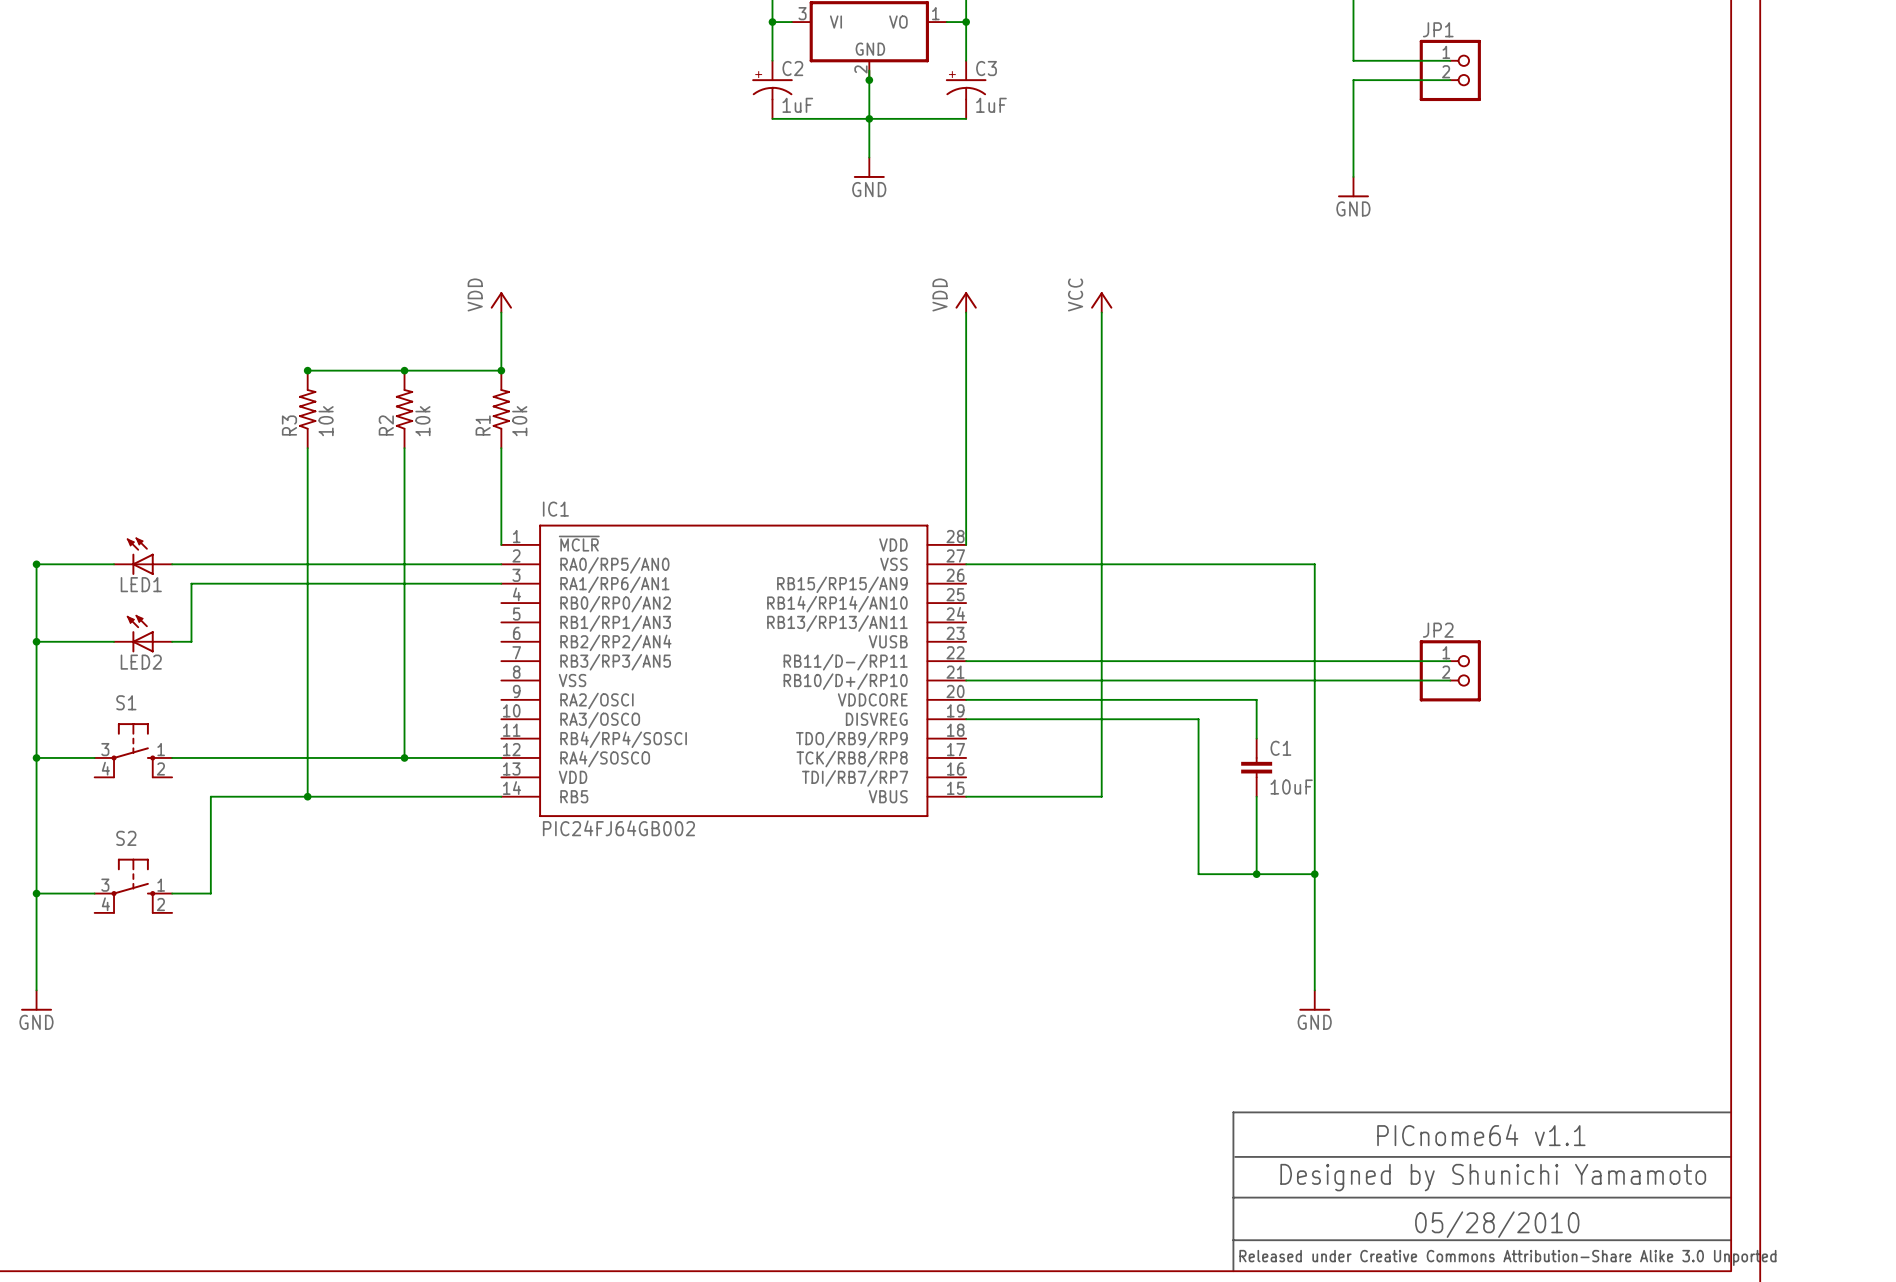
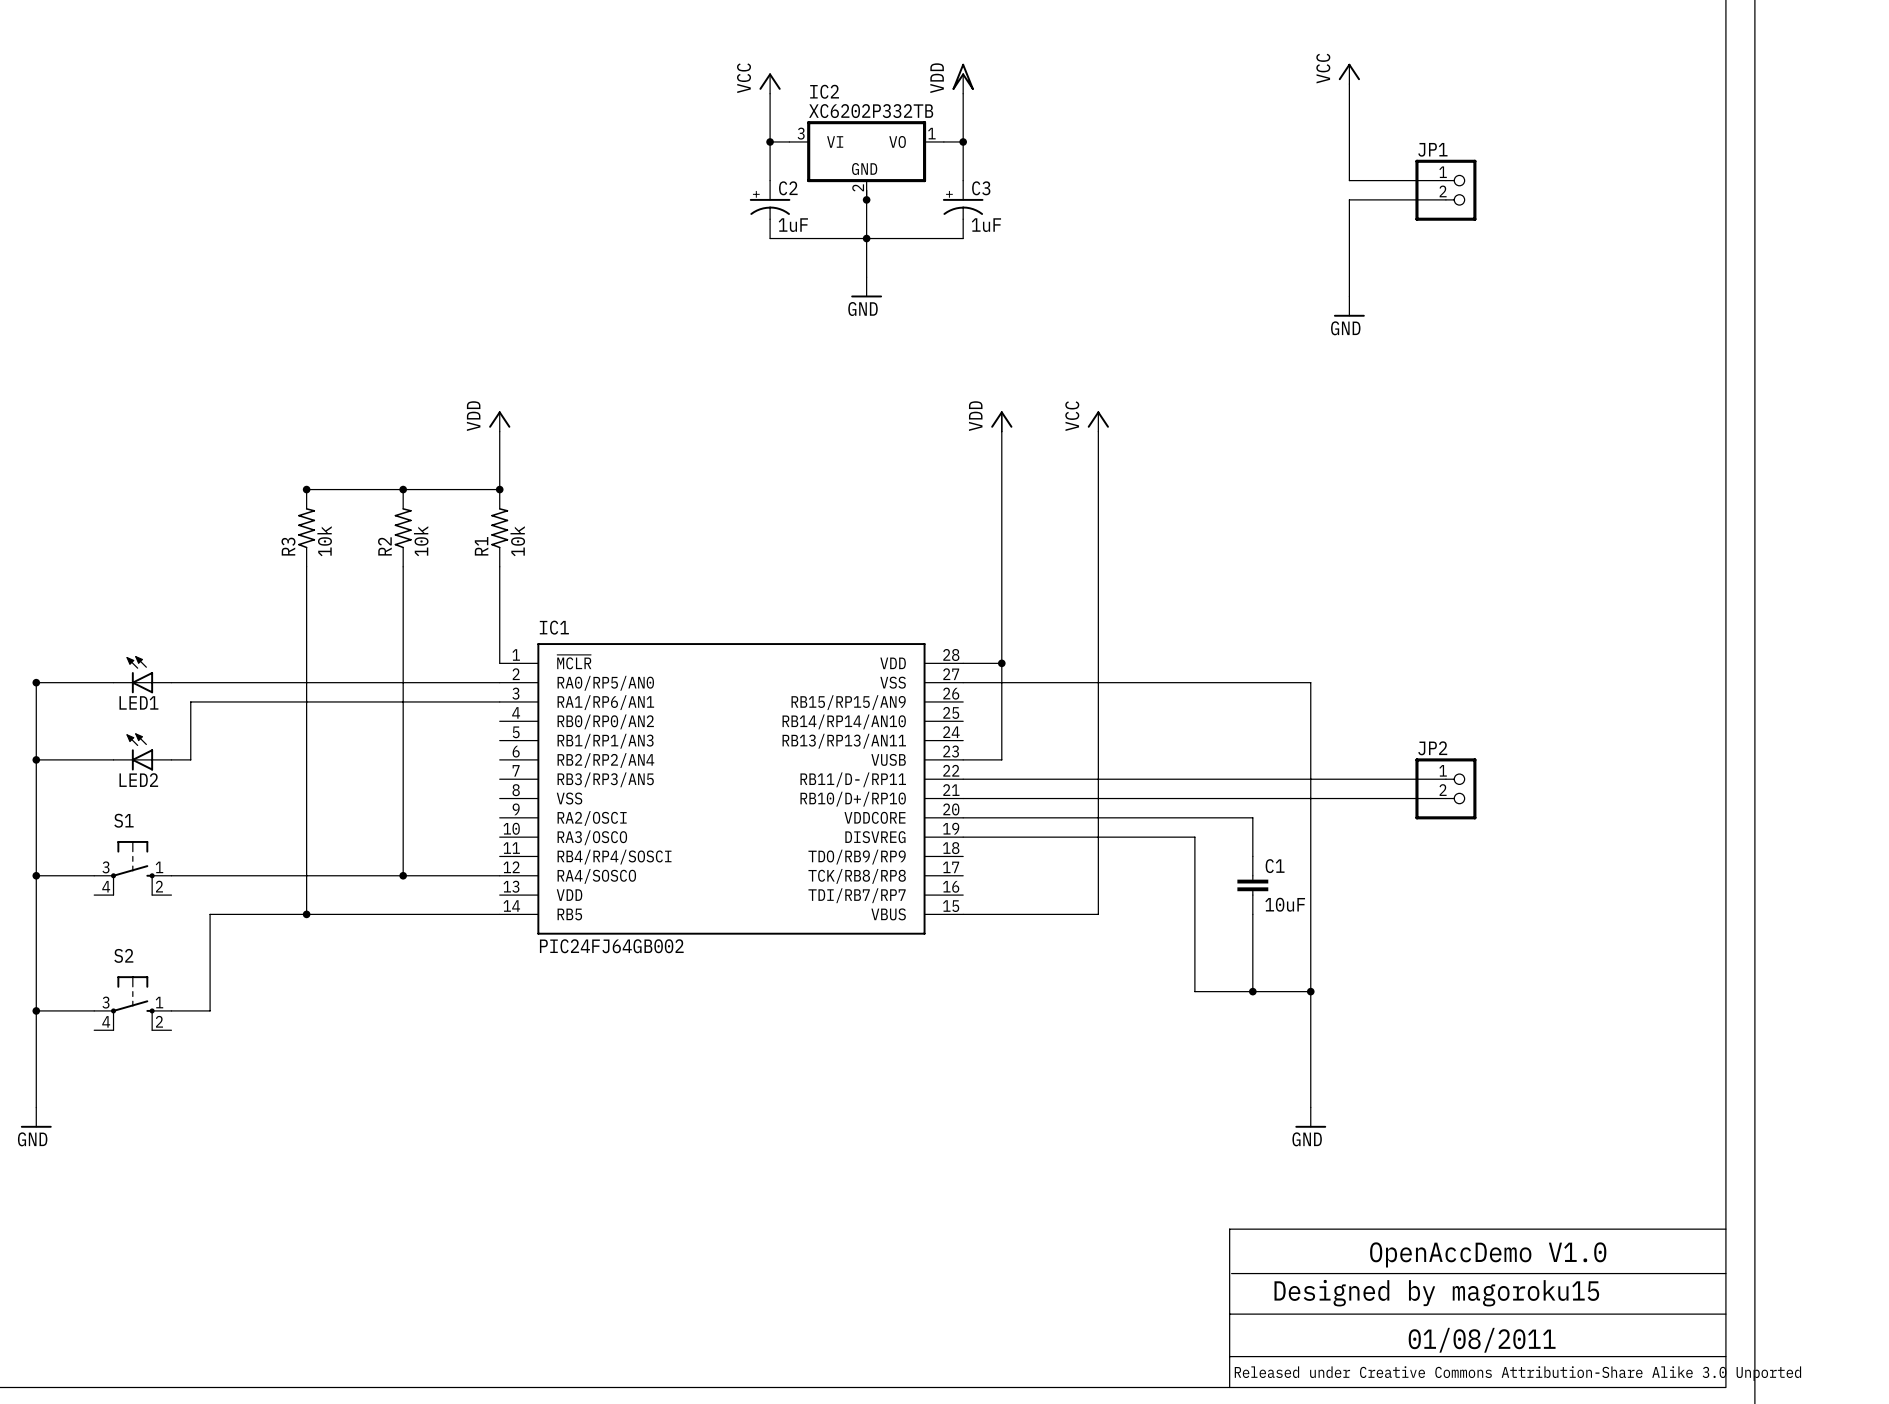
wire: none -> (1001, 412) (1001, 759) (963, 759)
power symbol position: VDD (966, 302) -> VDD (1001, 421)
wire: (966, 312) (966, 544) -> (1001, 663) (963, 663)
junction: none -> (1001, 663)
text: PICnome64 v1.1 (1481, 1135) -> OpenAccDemo V1.0 (1488, 1254)
text: Designed by Shunichi Yamamoto (1493, 1177) -> Designed by magoroku15 (1436, 1293)
text: 05/28/2010 (1497, 1224) -> 01/08/2011 (1482, 1340)

